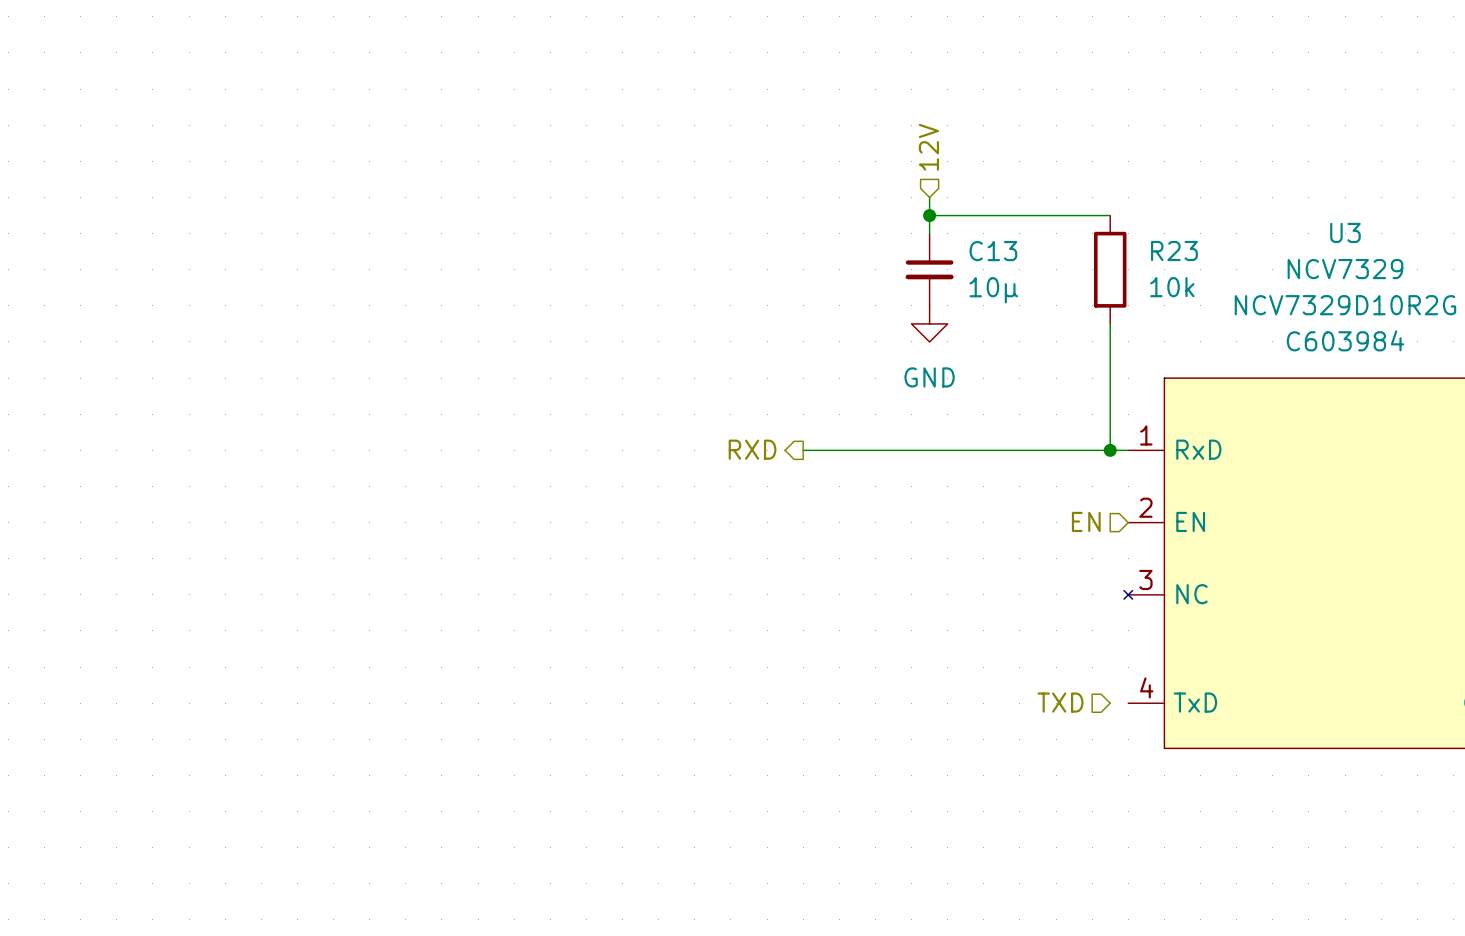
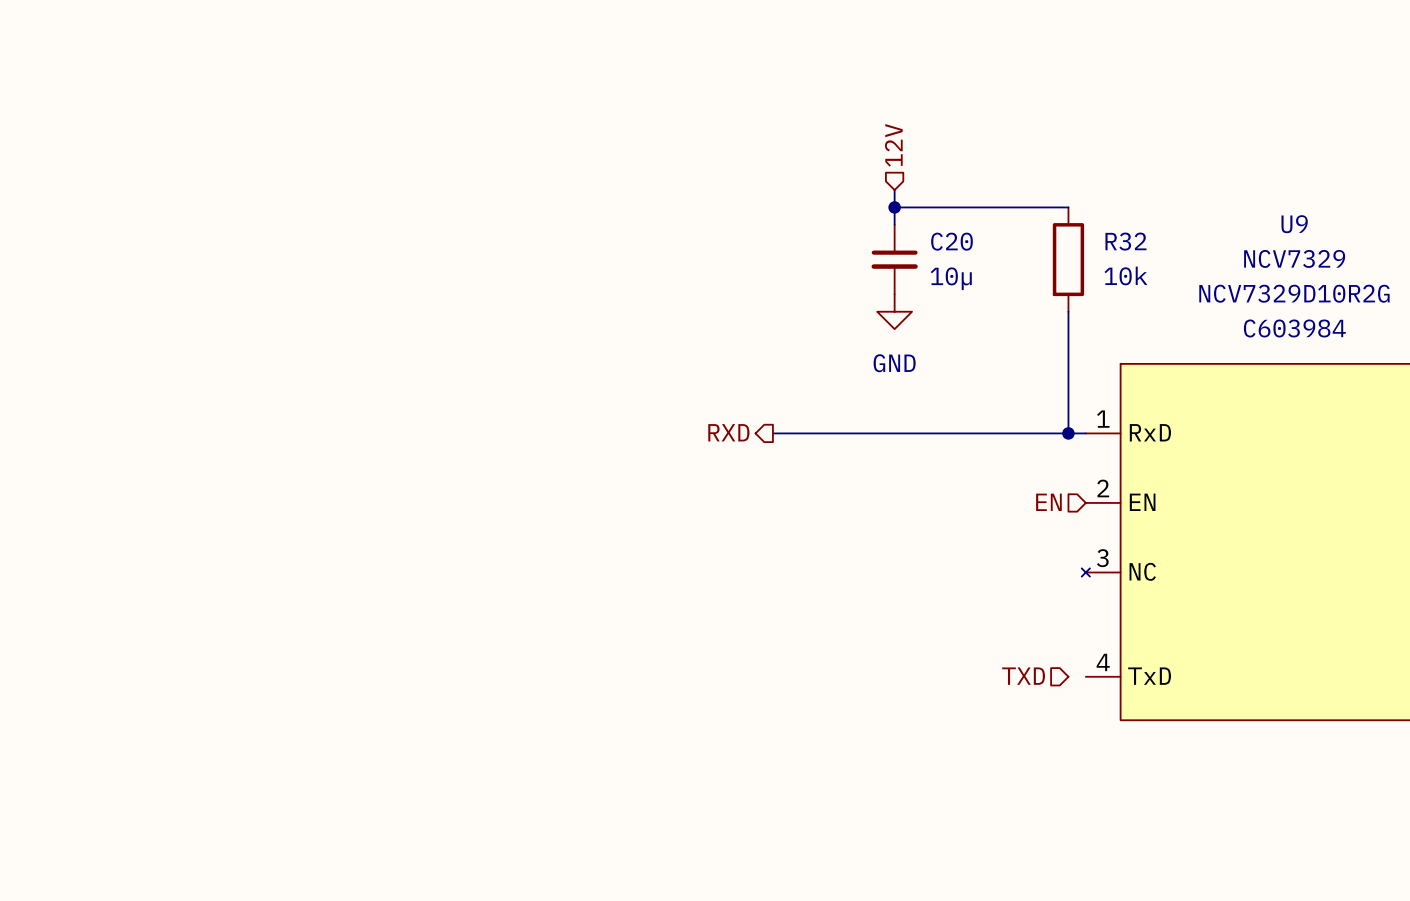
U3 name: U3 (1345, 232) -> U9 (1294, 224)
C13 name: C13 (993, 251) -> C20 (951, 241)
R23 name: R23 (1174, 251) -> R32 (1125, 241)

